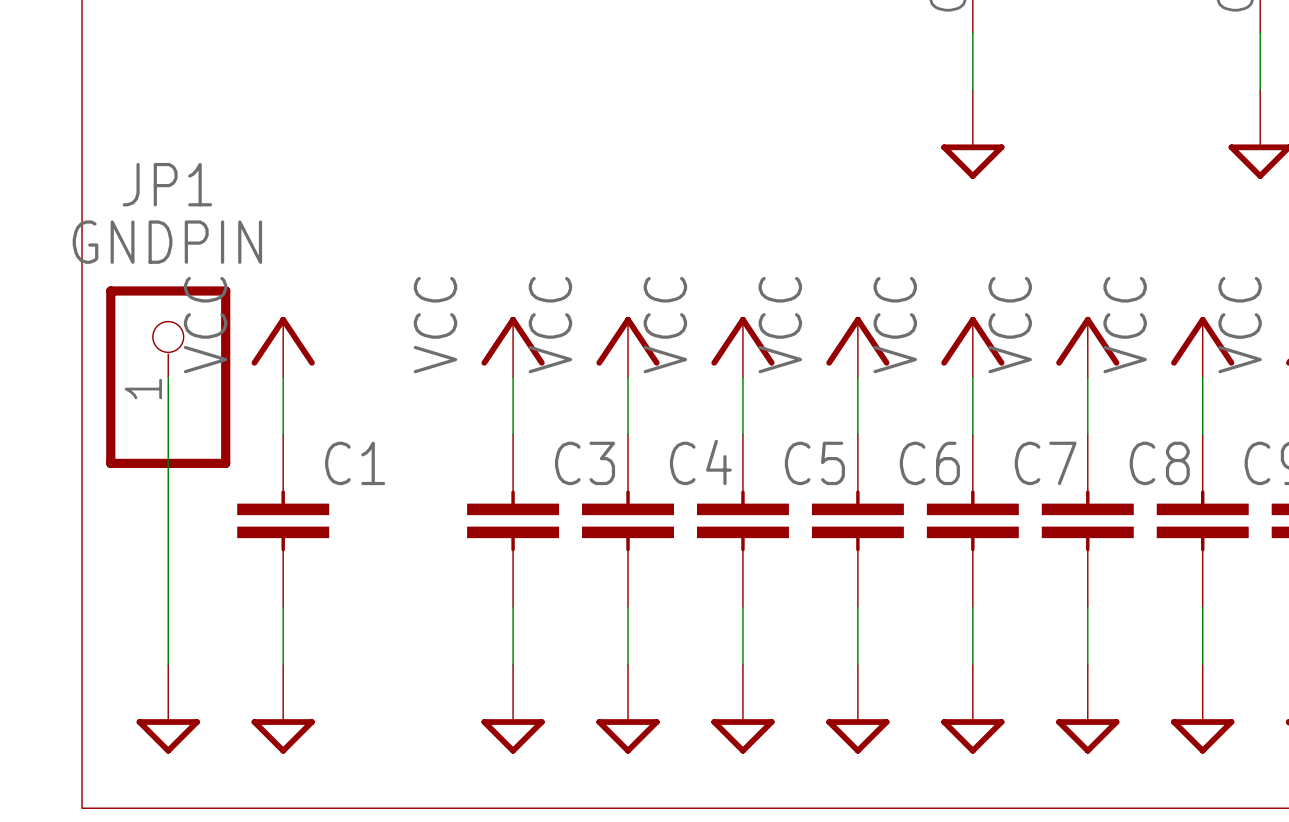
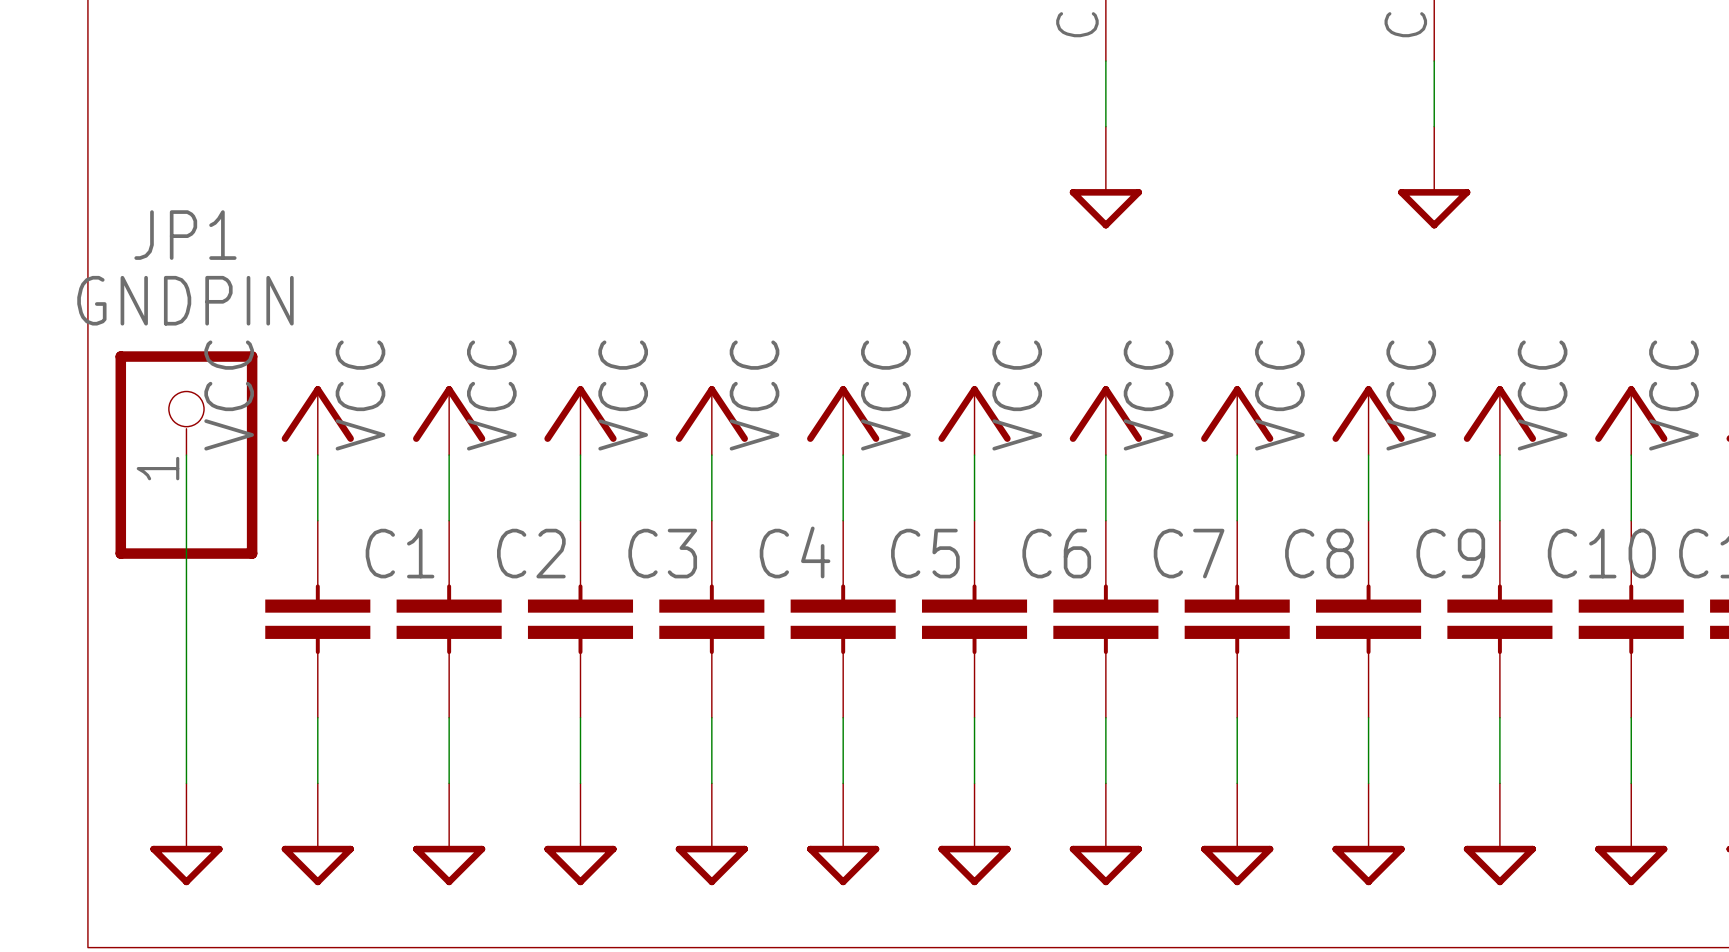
power symbol: none -> VCC (449, 420)
wire: none -> (449, 455) (449, 520)
C2: none -> (449, 619)
wire: none -> (449, 717) (449, 783)
power symbol: none -> (449, 834)

